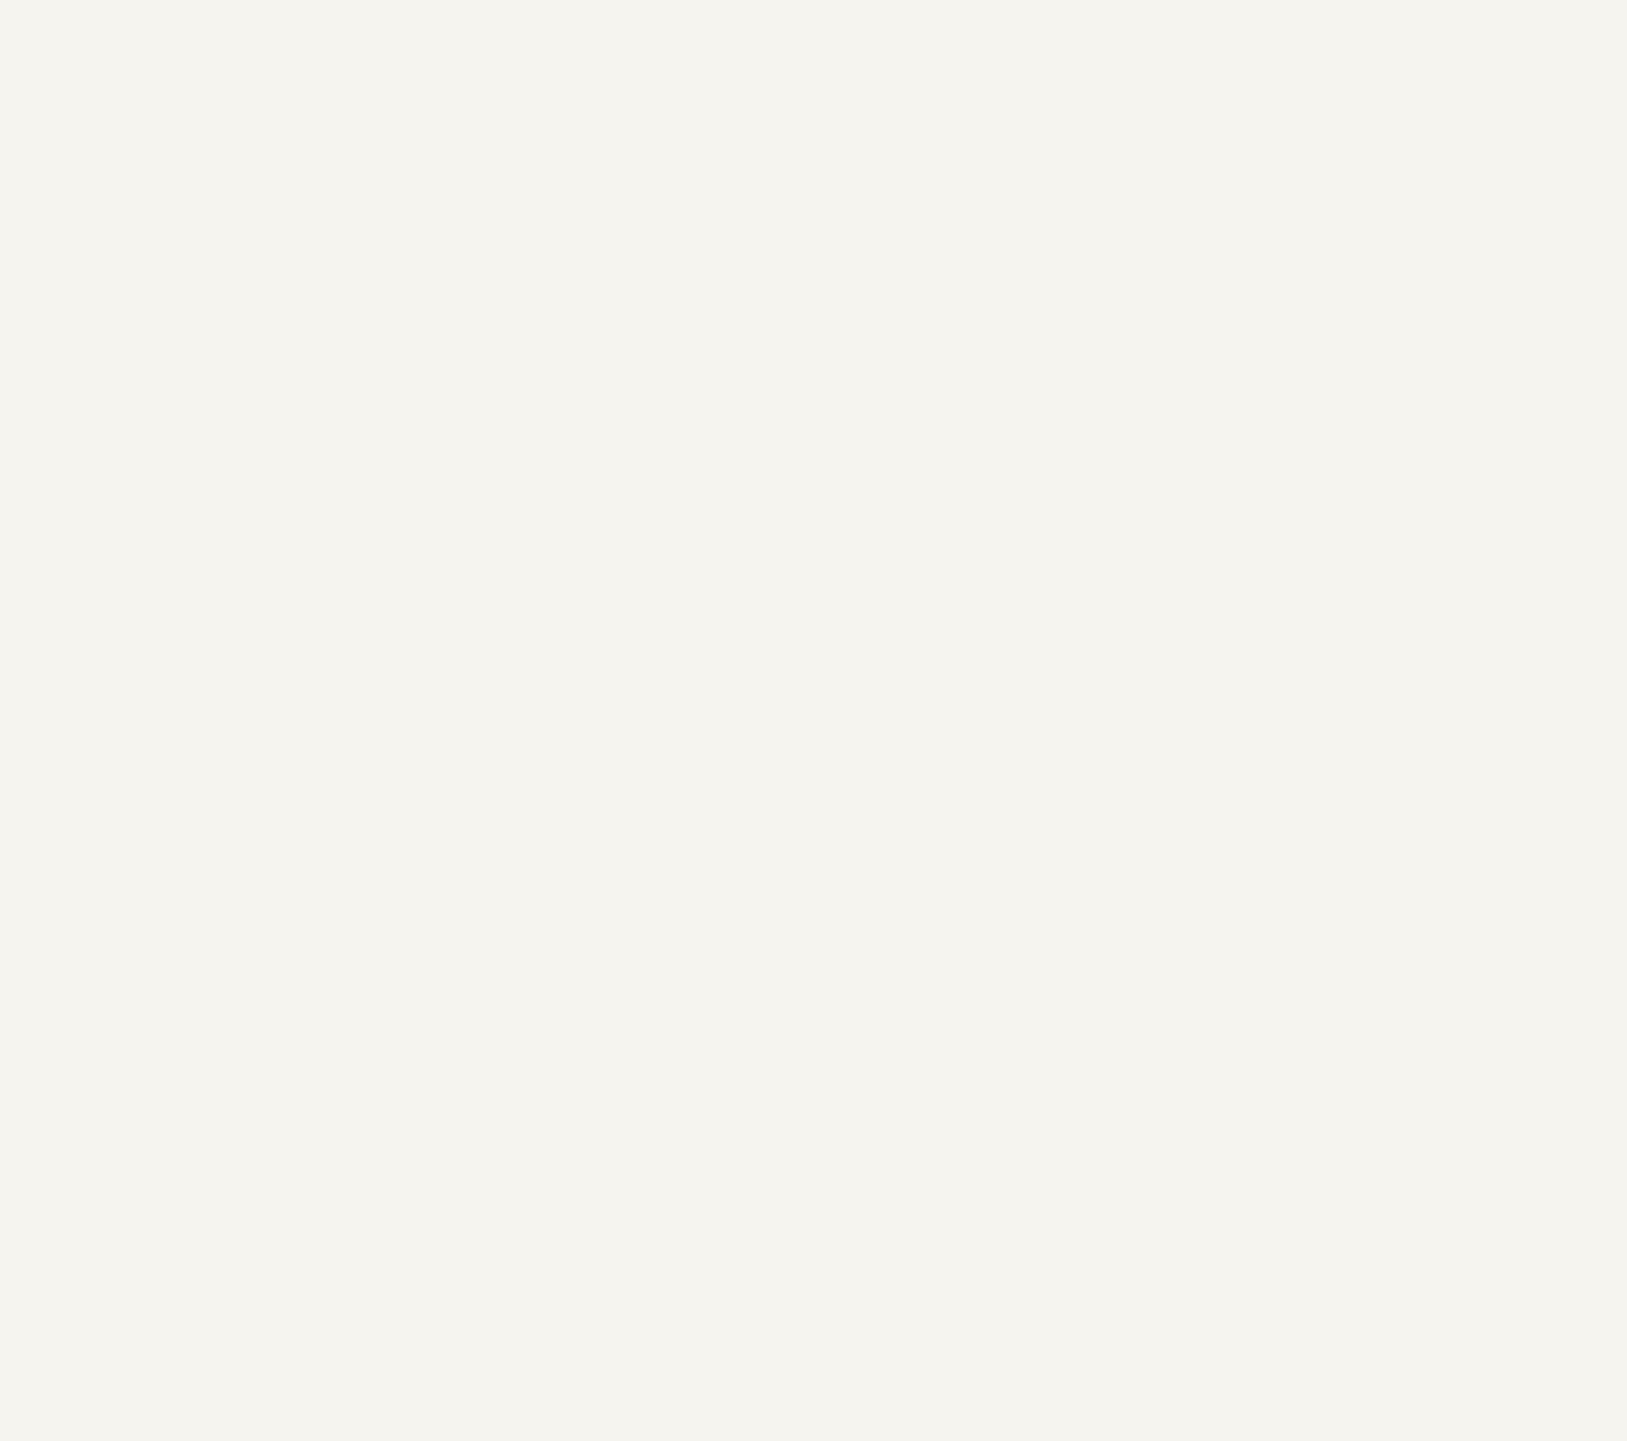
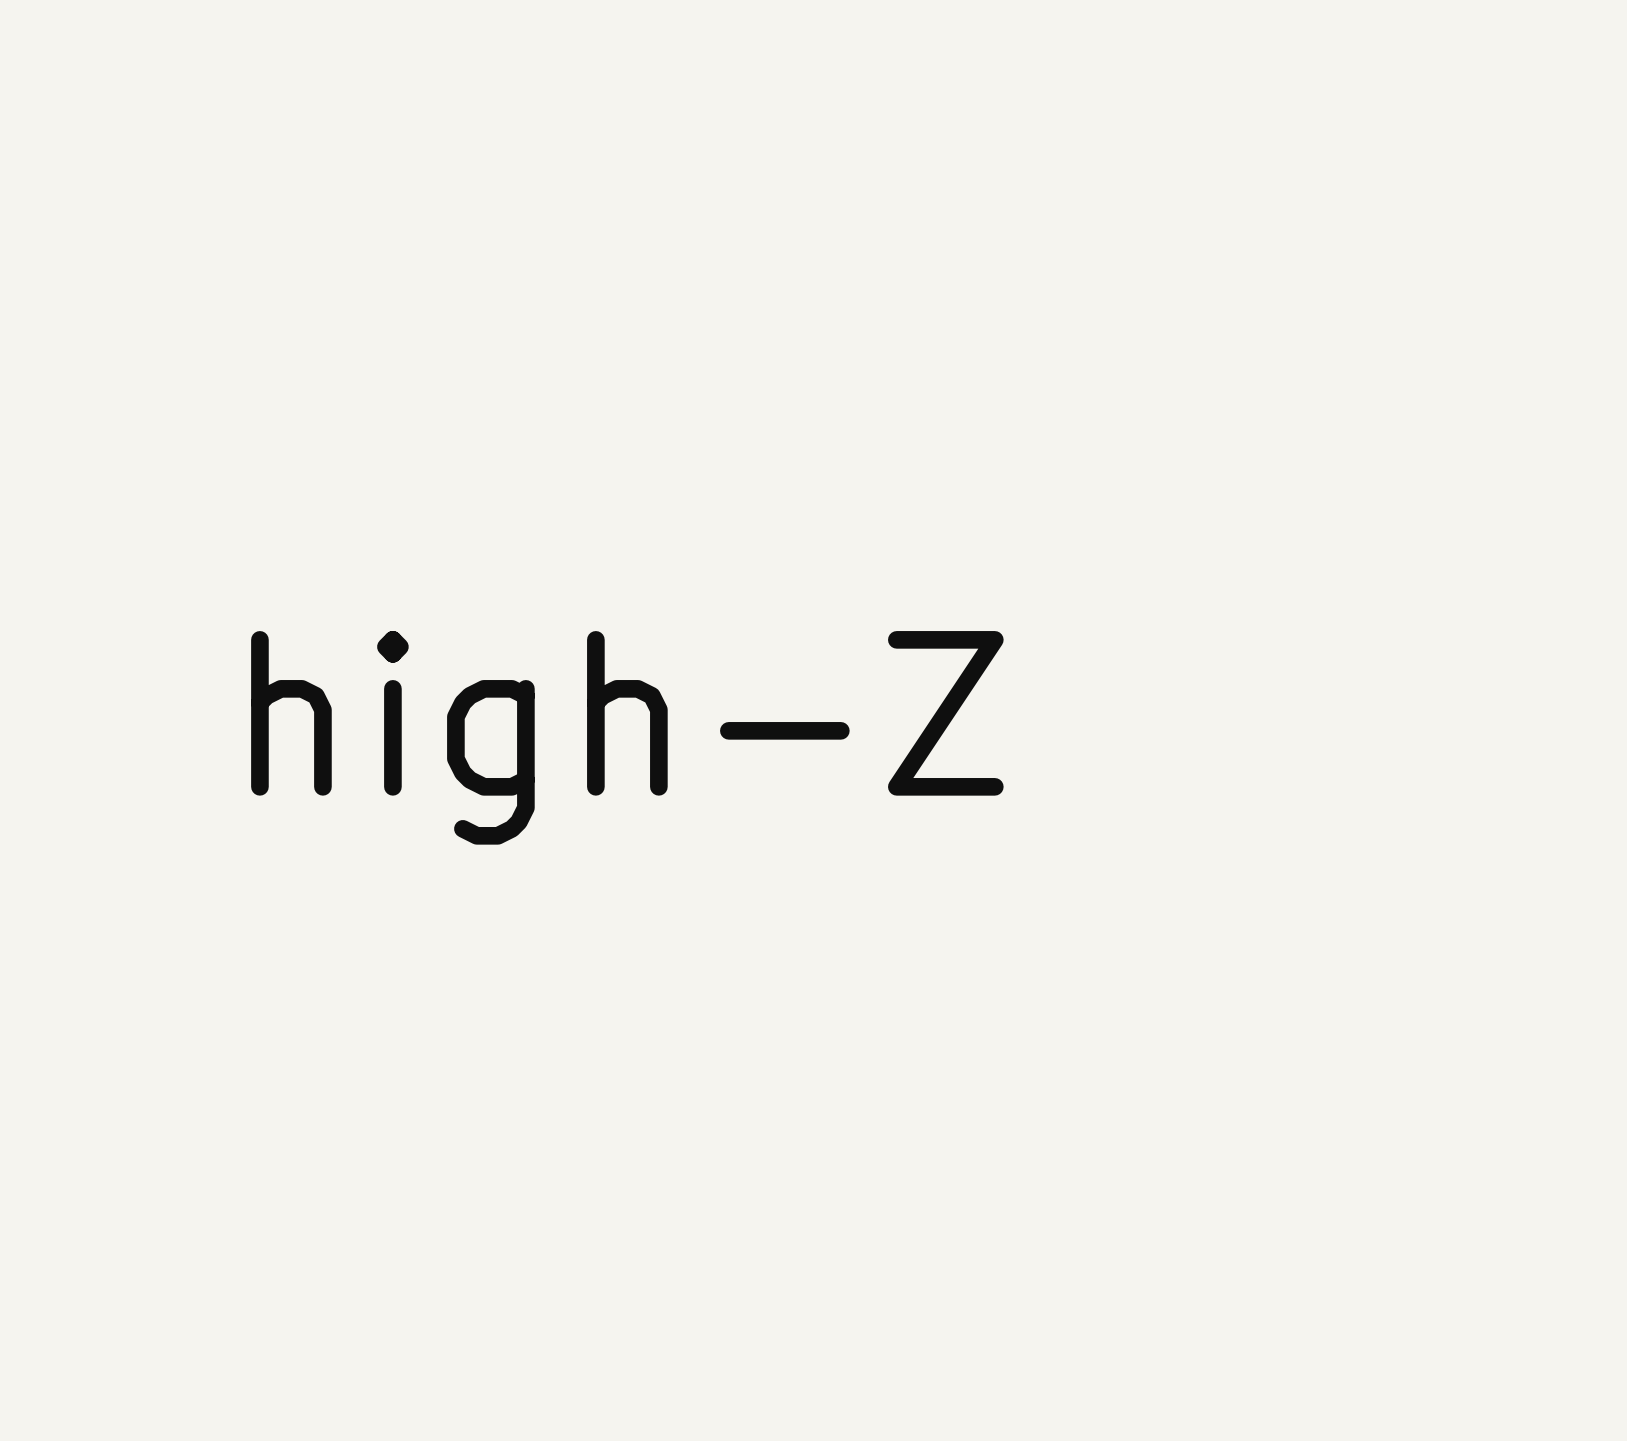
label: none -> high-Z (627, 737)

